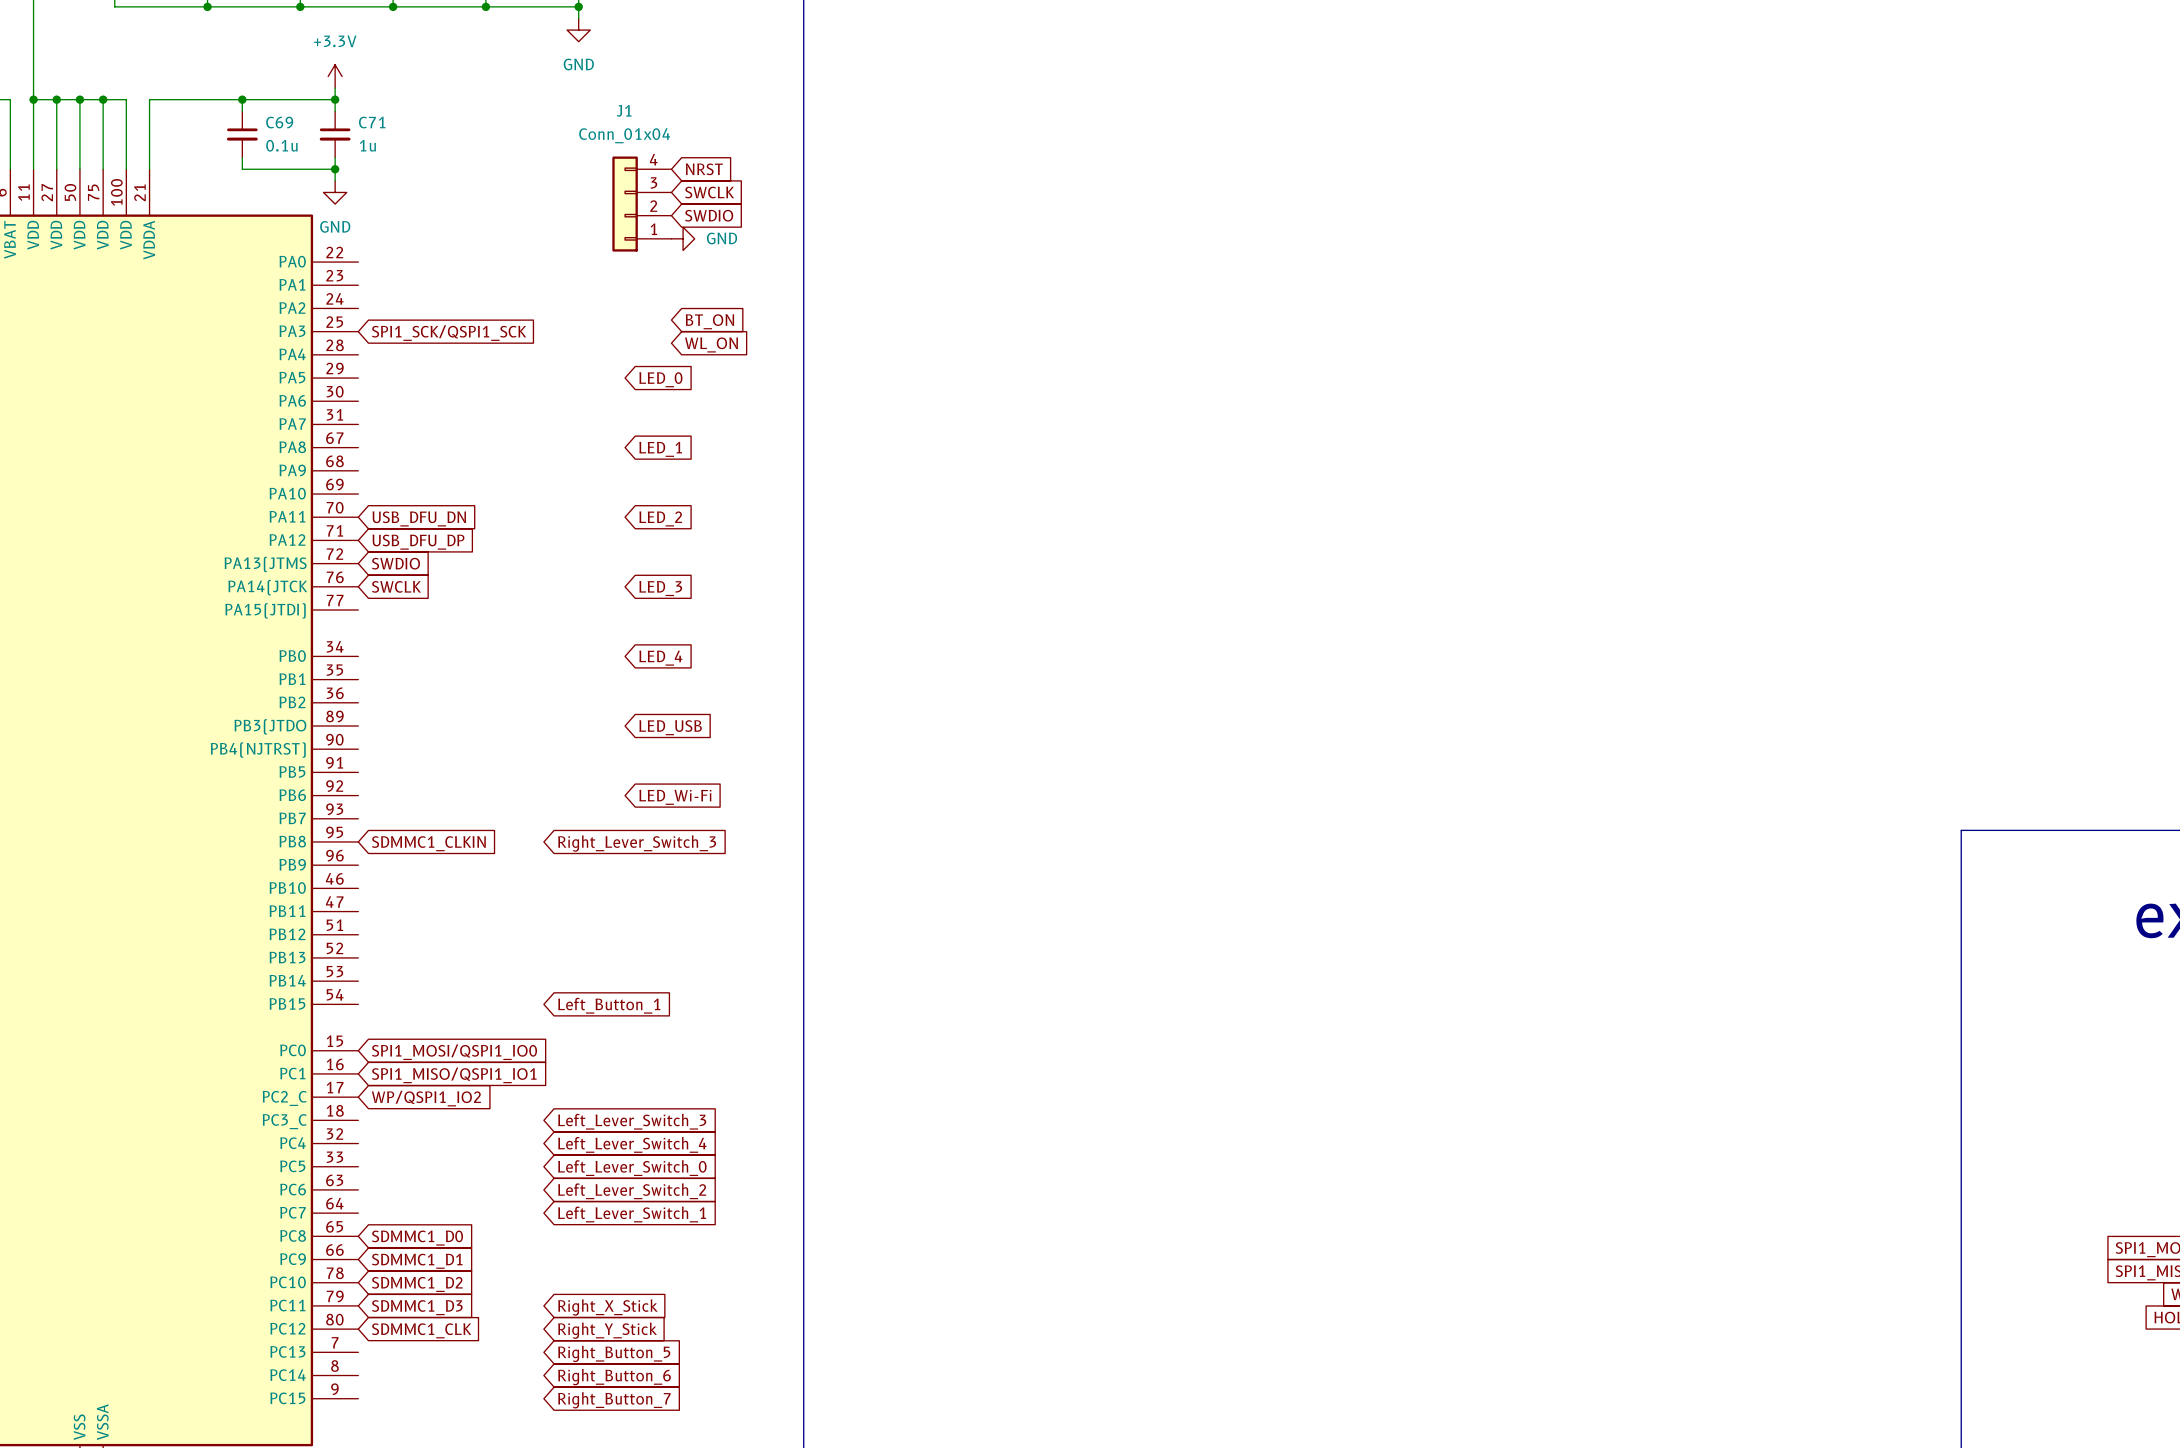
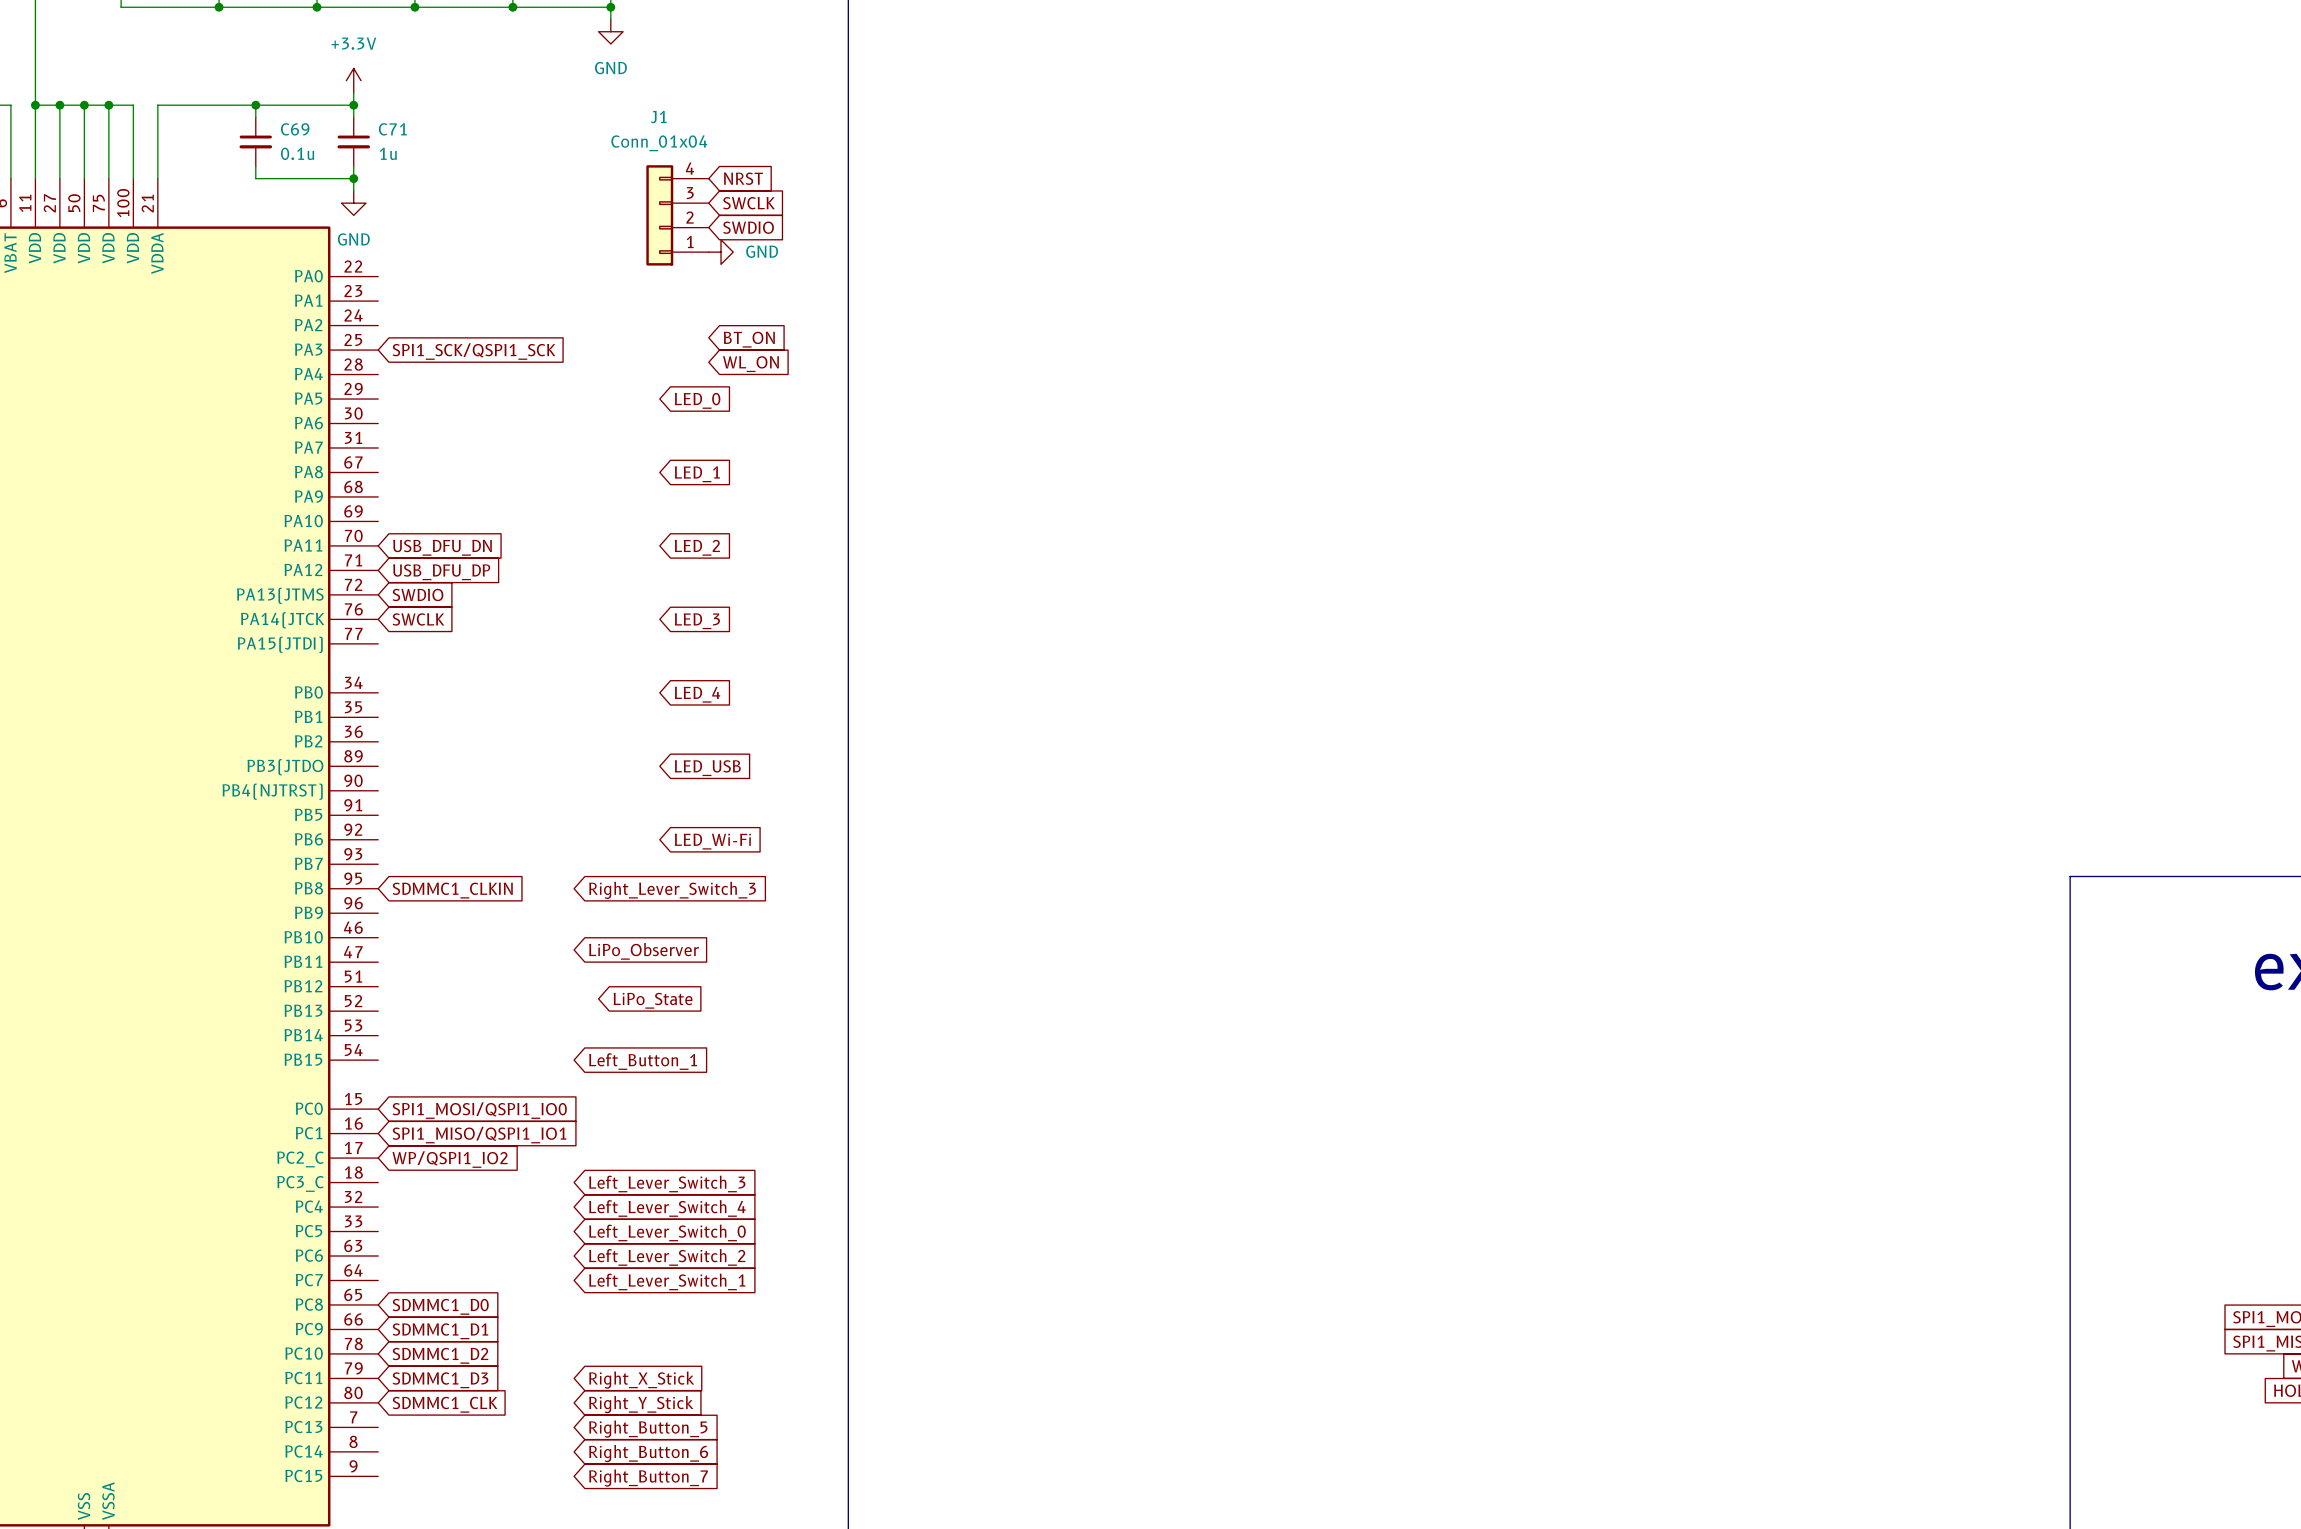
global label: none -> LiPo_Observer (644, 951)
global label: none -> LiPo_State (653, 1000)

